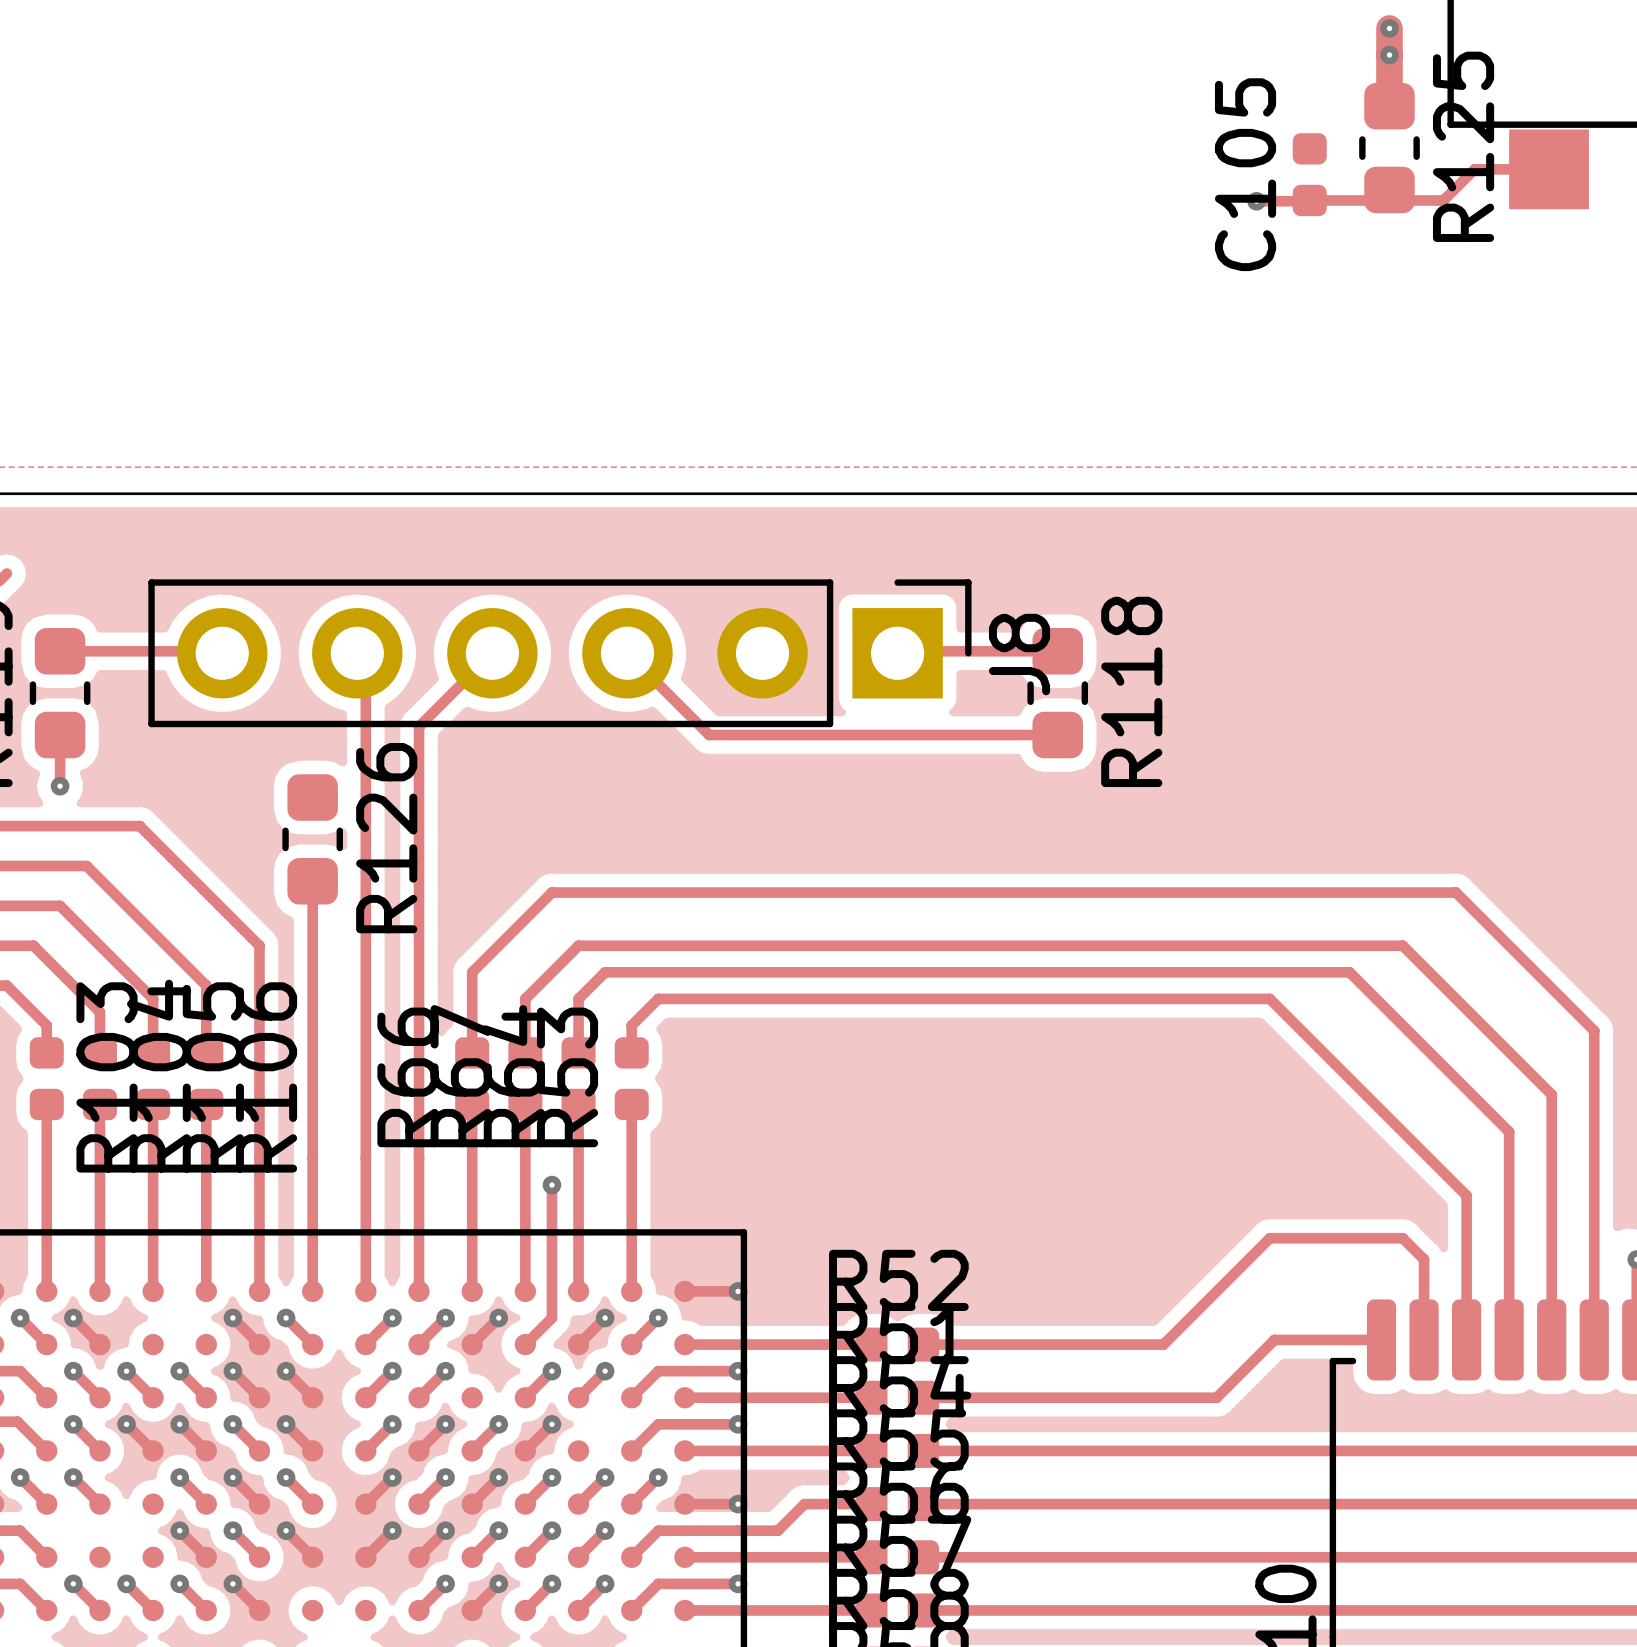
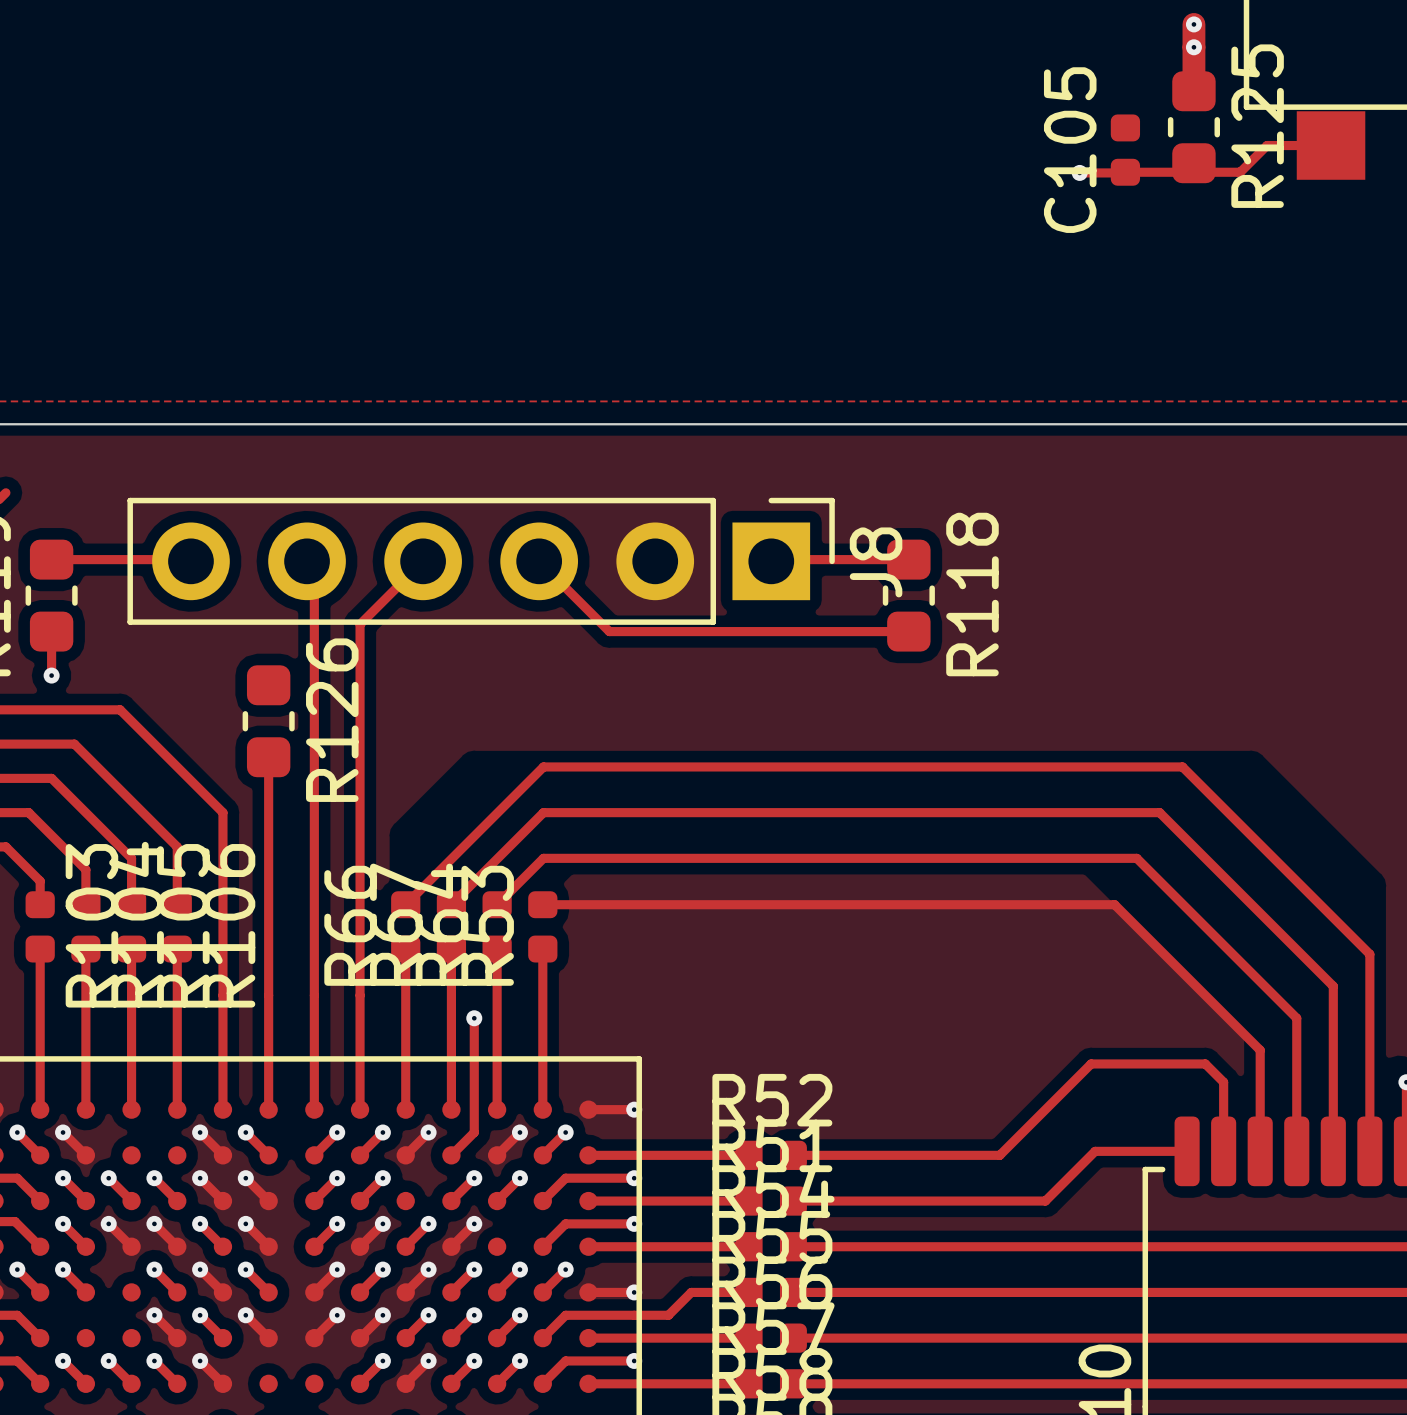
track: (632, 892) (551, 892) (472, 972) (472, 1052) -> (543, 766) (405, 904)
track: (1376, 892) (1455, 892) (1594, 1030) (1594, 1110) -> (1182, 766) (1369, 954)
track: (632, 945) (578, 945) (525, 998) (525, 1052) -> (543, 812) (451, 904)
track: (1349, 945) (1402, 945) (1551, 1094) (1551, 1147) -> (1159, 812) (1333, 986)
track: (658, 998) (631, 1025) (631, 1052) -> (565, 858) (543, 858) (497, 904)
track: (1269, 998) (1466, 1195) (1466, 1222) -> (1091, 858) (1136, 858) (1296, 1018)
track: (578, 1052) (578, 998) (605, 972) (1349, 972) (1509, 1131) (1509, 1185) -> none
track: none -> (542, 904) (1114, 904) (1260, 1050)

